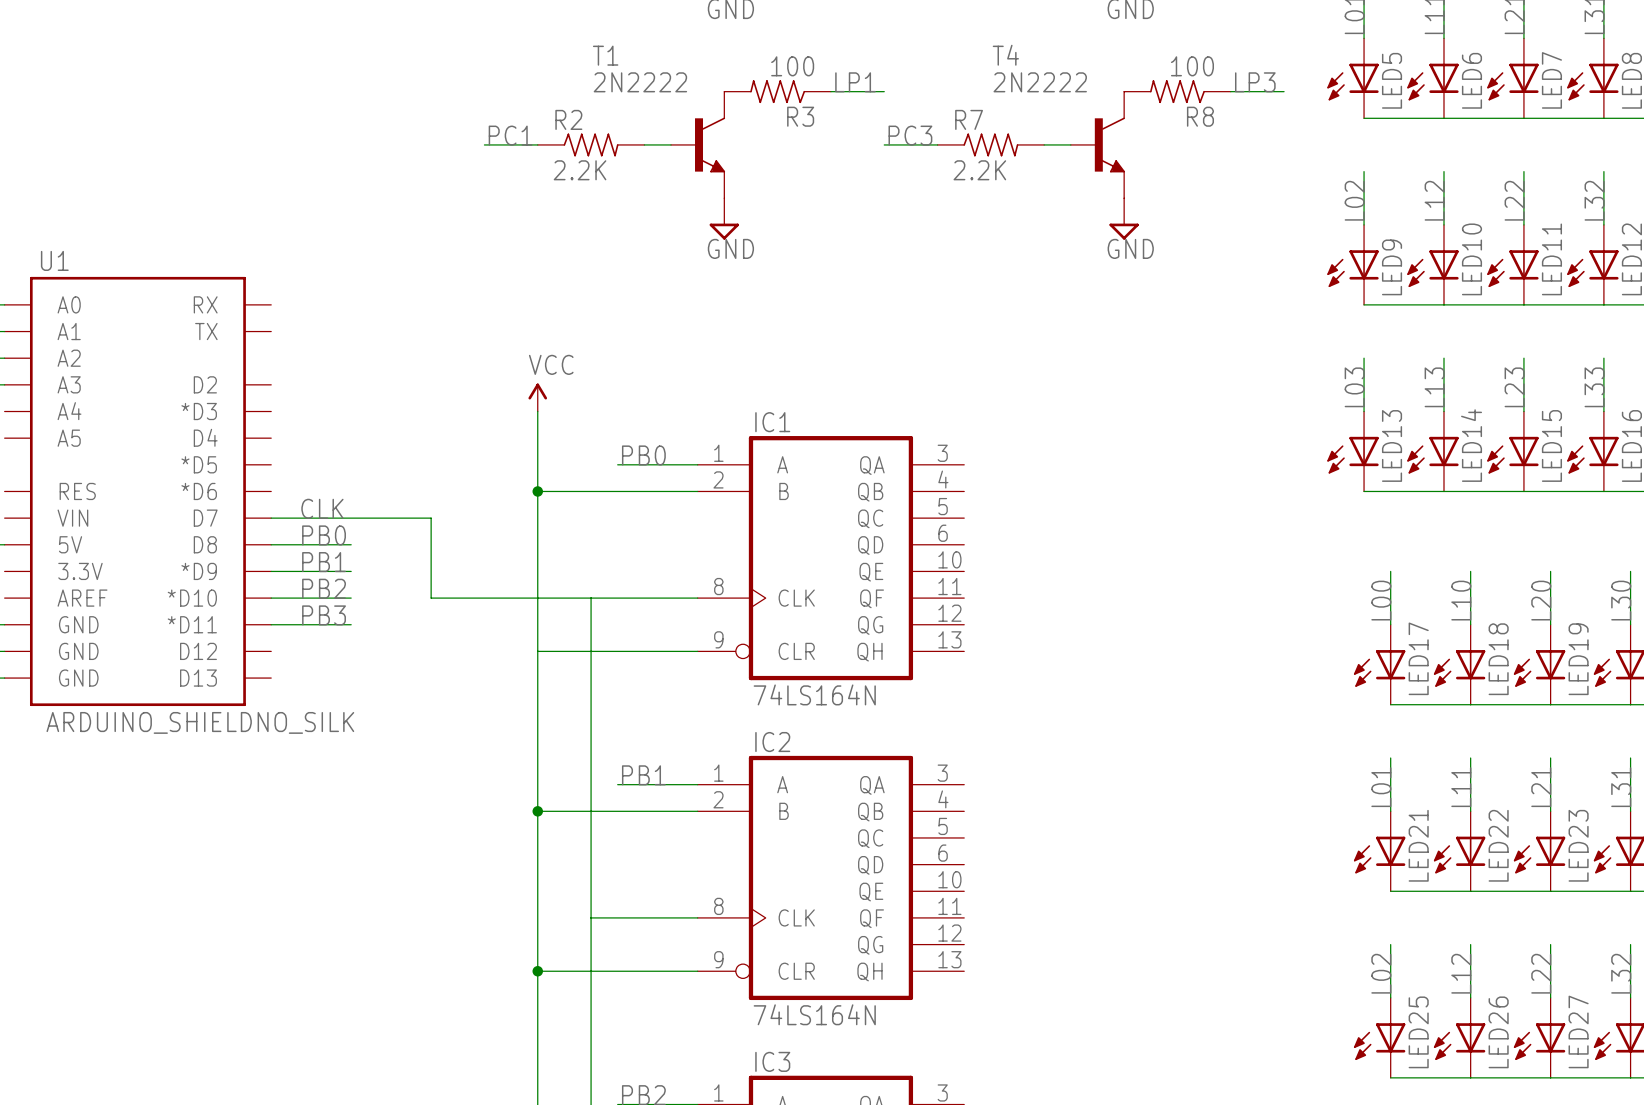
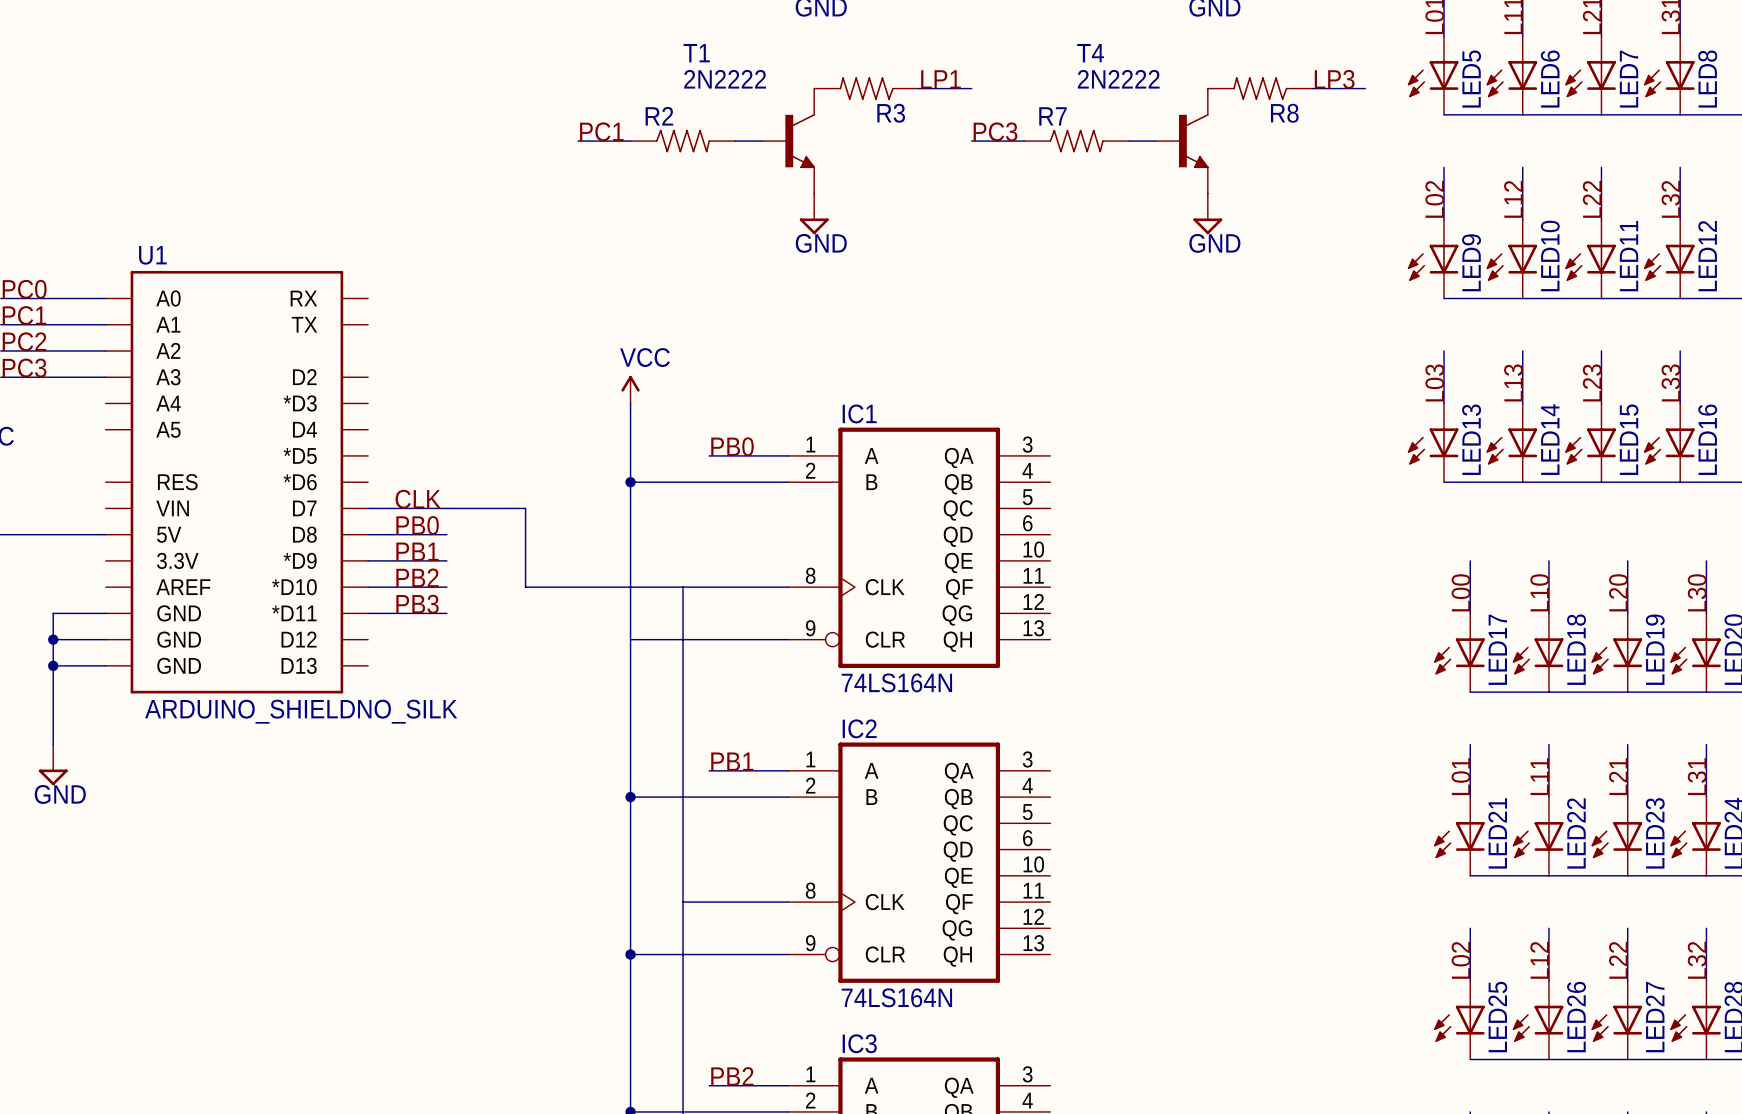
R3 value: 100 (792, 66) -> none
R8 value: 100 (1192, 66) -> none
R2 value: 2.2K (580, 170) -> none
R7 value: 2.2K (979, 170) -> none

